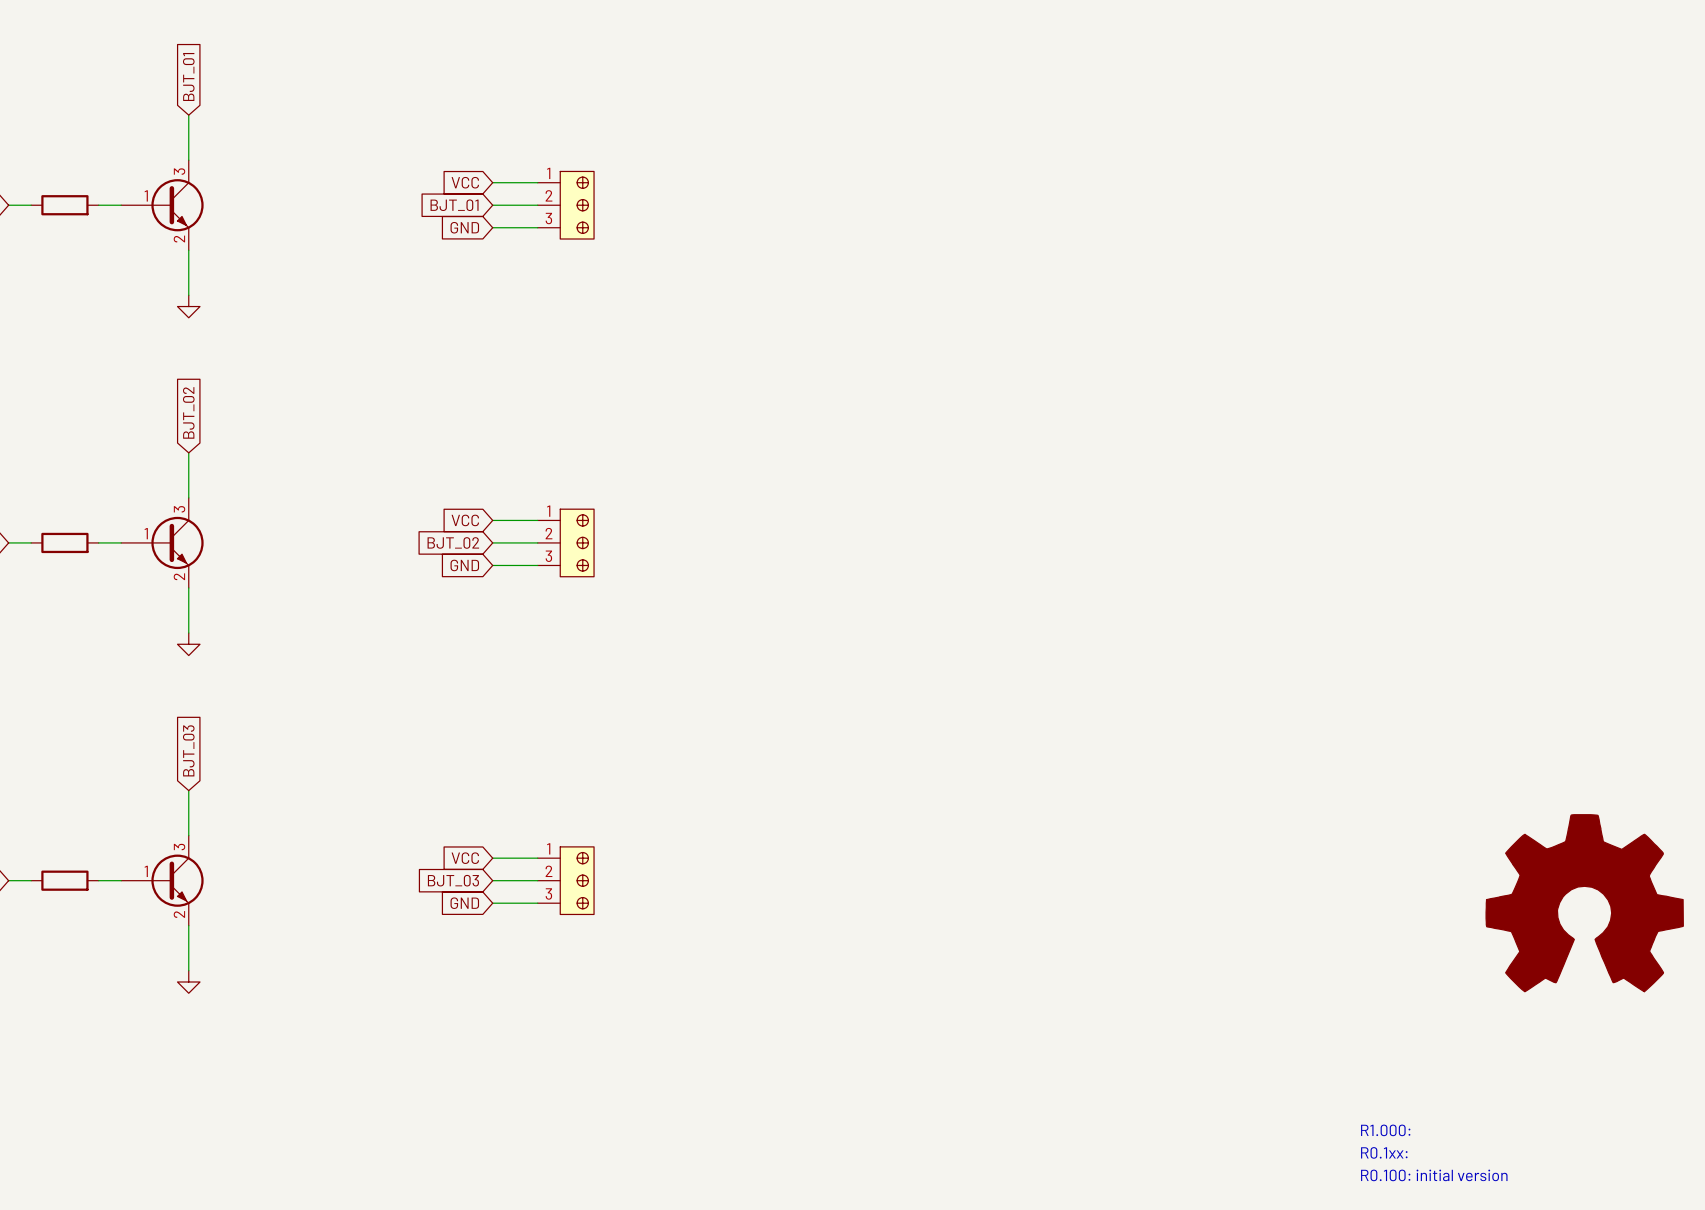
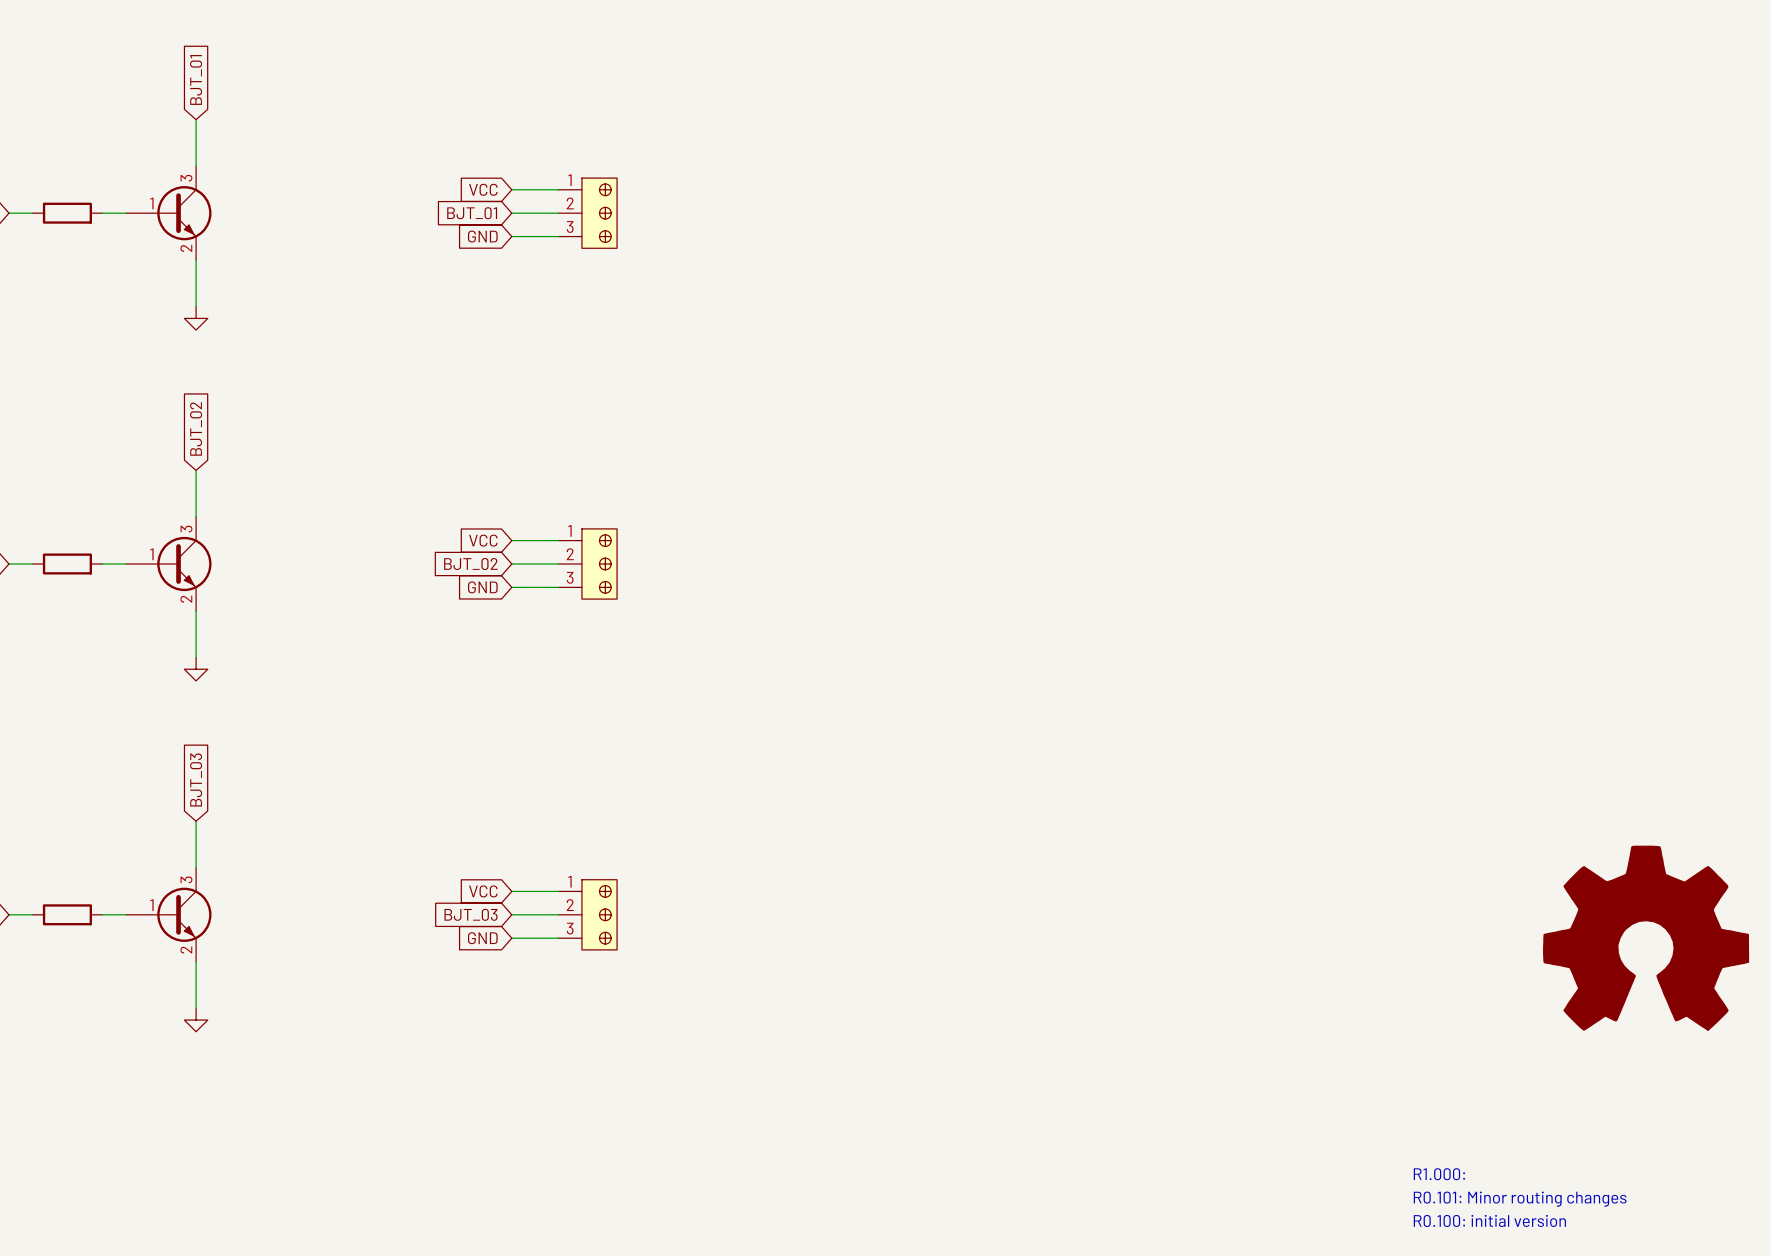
text: R0.1xx: (1384, 1152) -> R0.101: Minor routing changes (1520, 1199)

